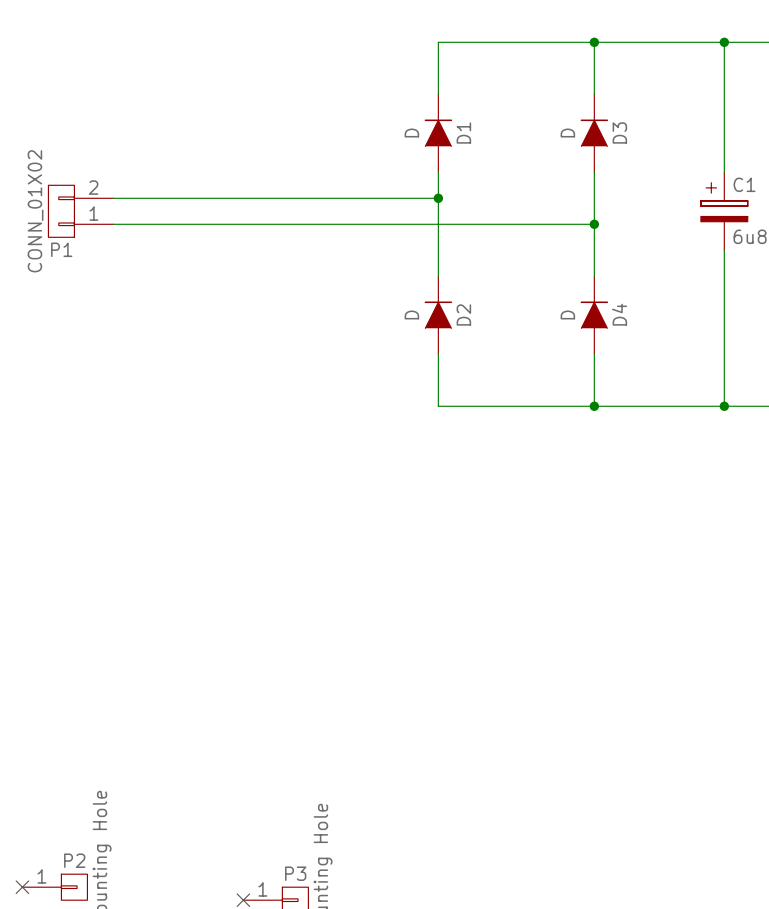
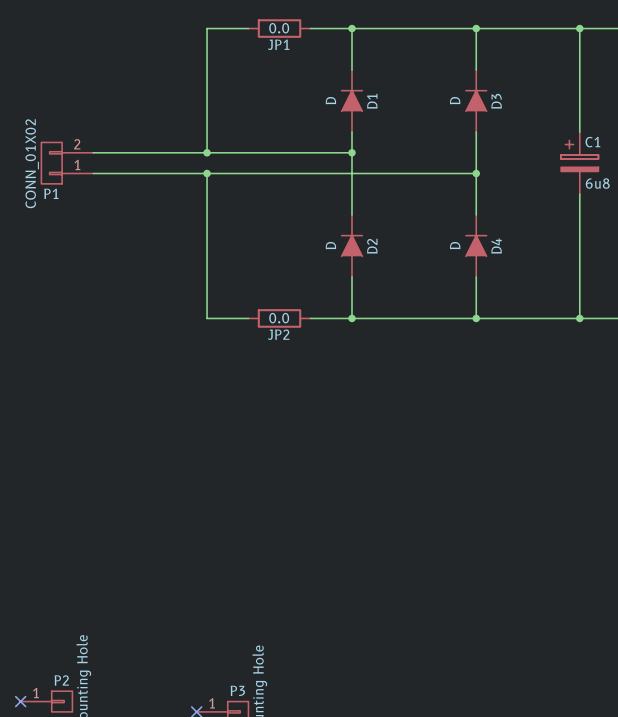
wire: none -> (248, 28) (207, 28) (207, 152)
JP1: none -> 0.0 (279, 28)
wire: none -> (310, 28) (352, 28)
junction: none -> (352, 28)
junction: none -> (207, 152)
wire: none -> (207, 173) (207, 318) (248, 318)
junction: none -> (207, 173)
JP2: none -> 0.0 (279, 318)
wire: none -> (310, 318) (352, 318)
junction: none -> (352, 318)

